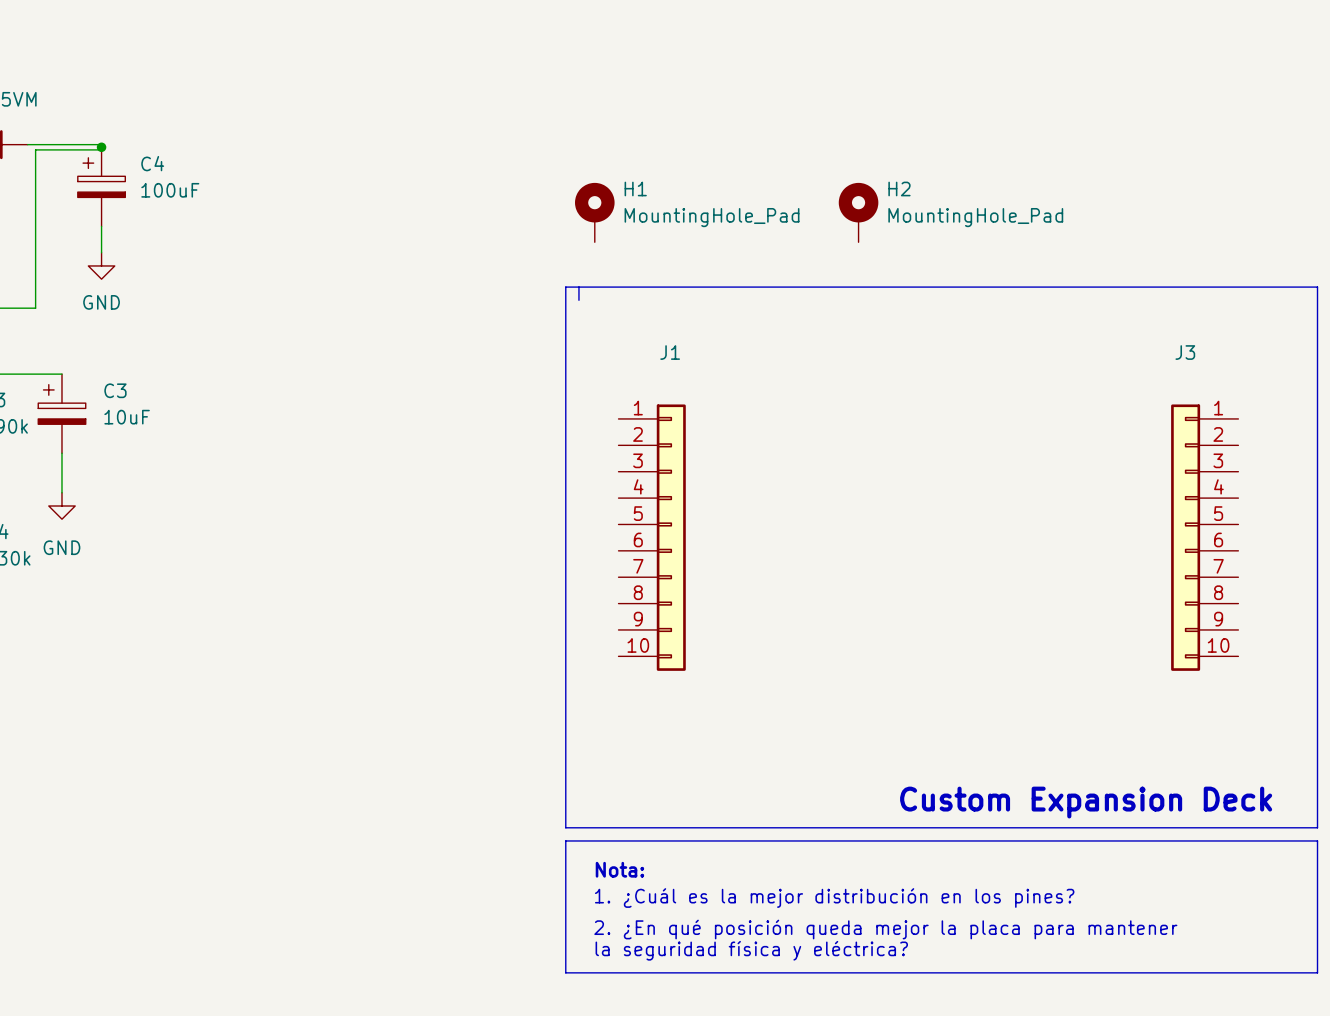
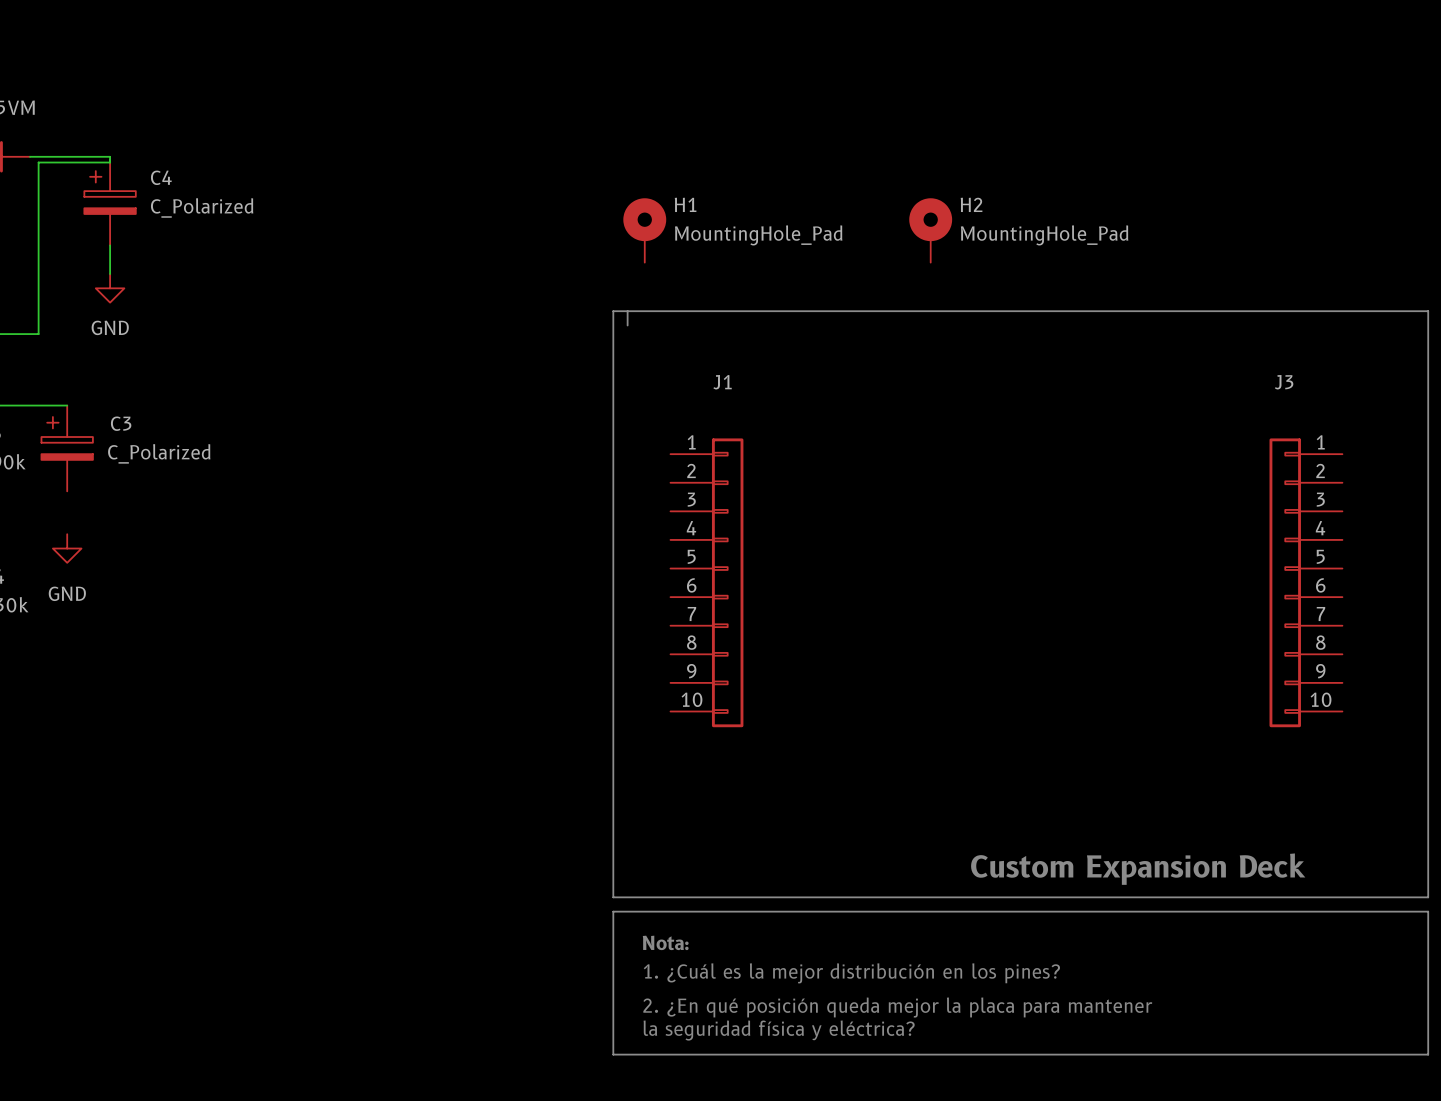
junction: (101, 147) -> none
C4 value: 100uF (170, 190) -> C_Polarized (202, 207)
C3 value: 10uF (127, 417) -> C_Polarized (159, 453)
wire: (61, 453) (61, 492) -> none

